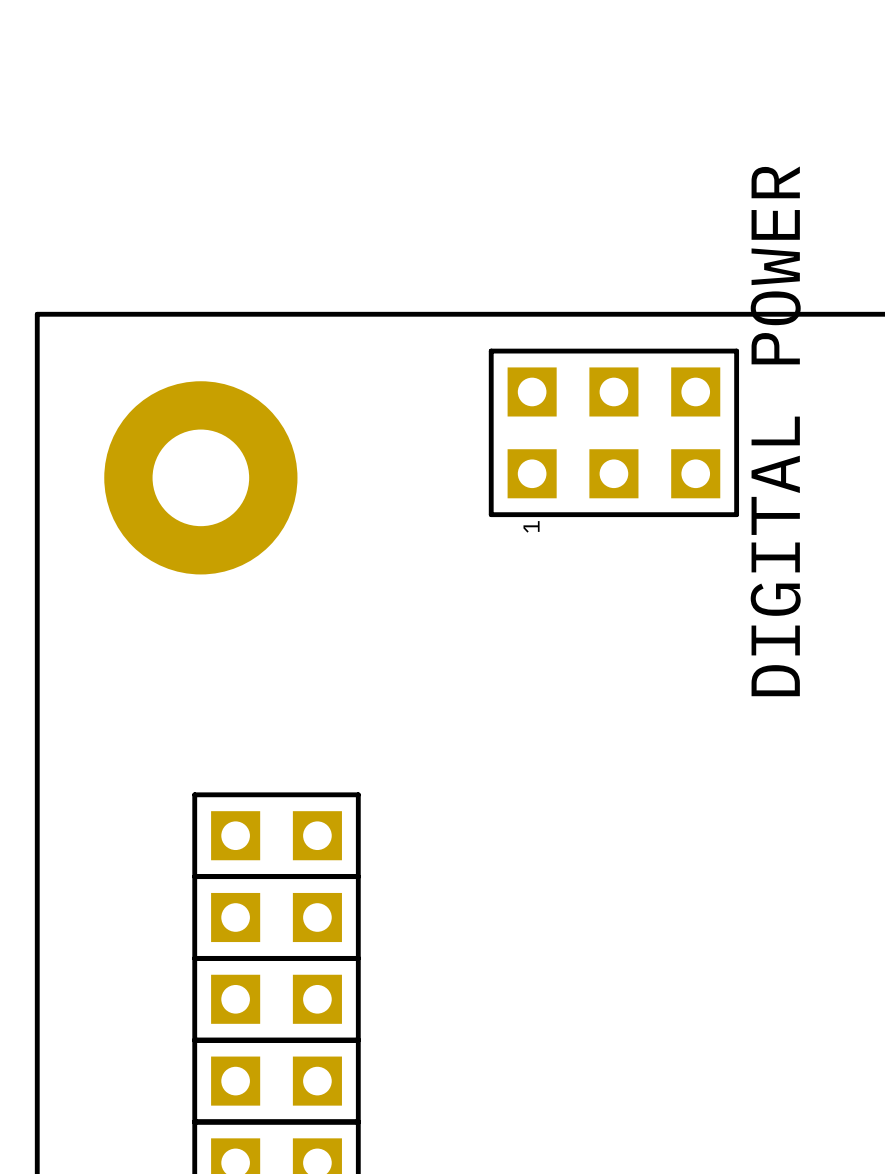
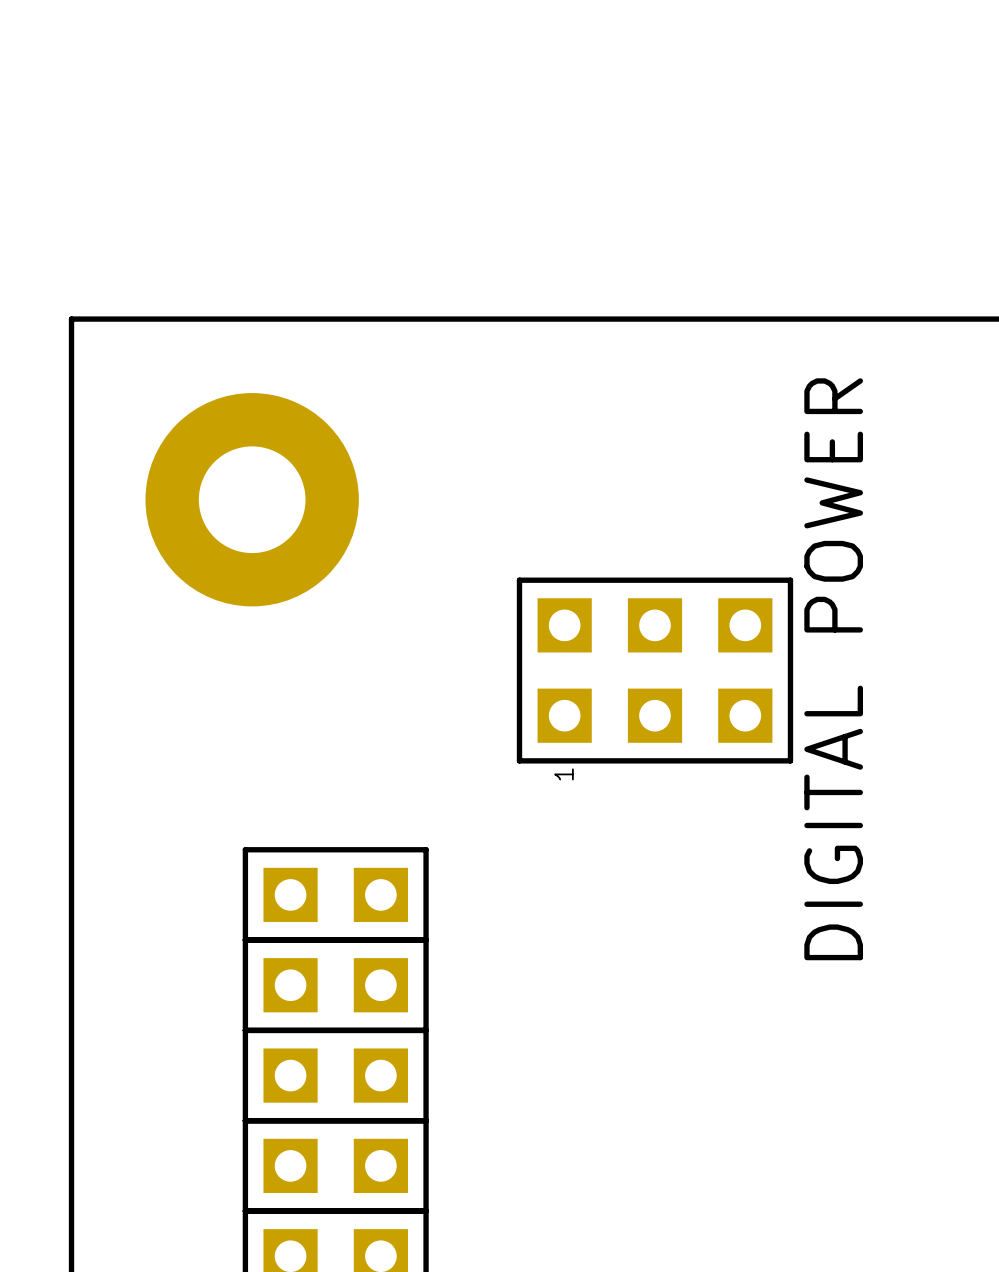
part position: (613, 432) -> (654, 670)

